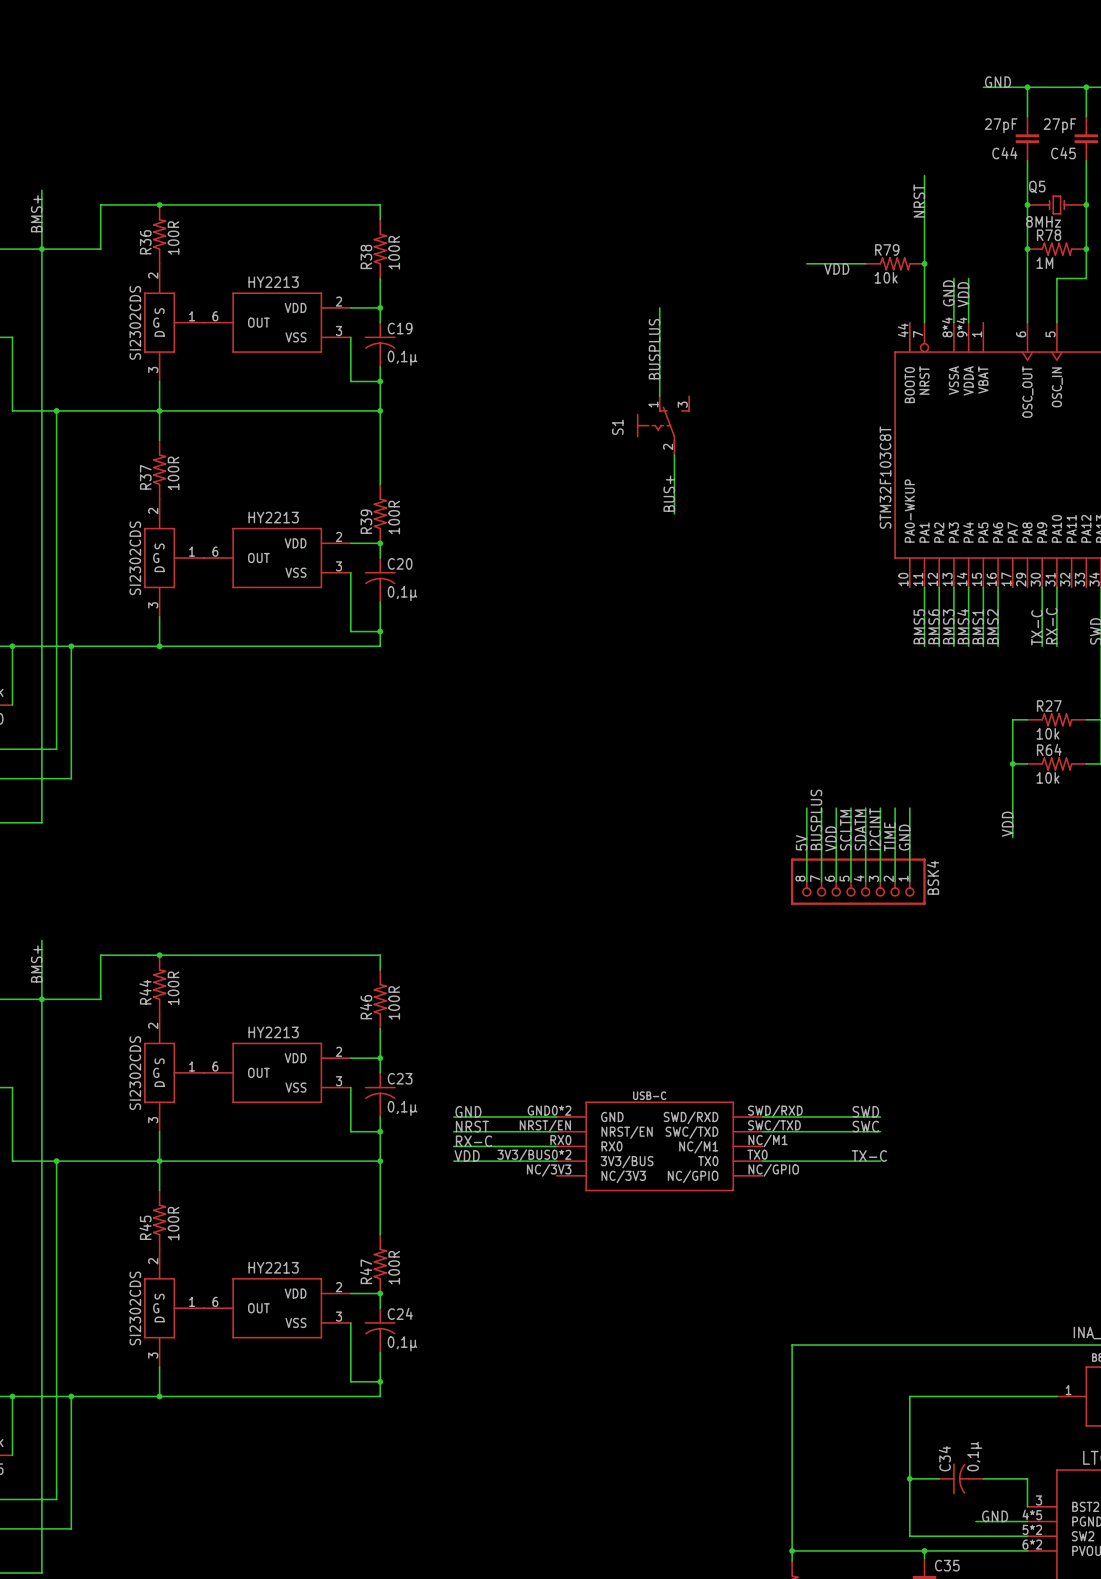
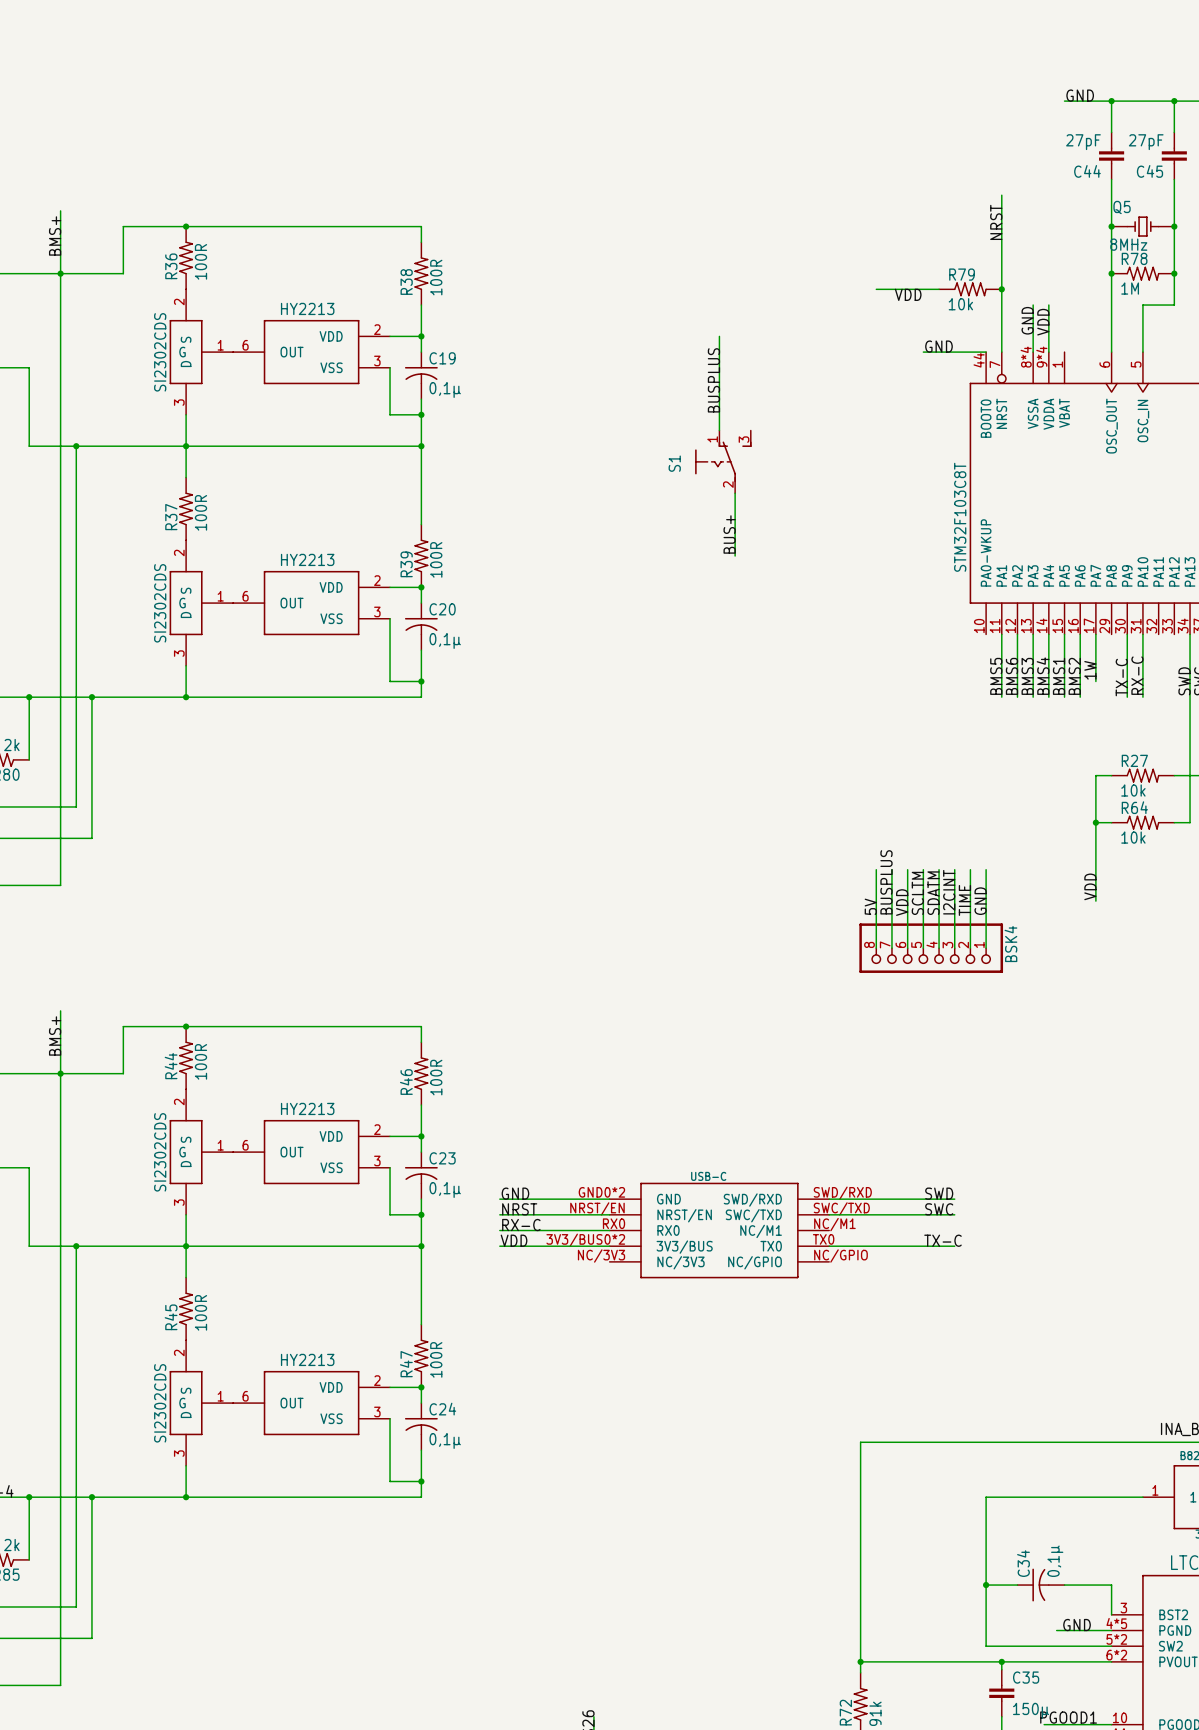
label: none -> GND (938, 346)
wire: none -> (923, 352) (986, 352)
wire: none -> (1095, 634) (1095, 681)
label: none -> 1W (1090, 670)

